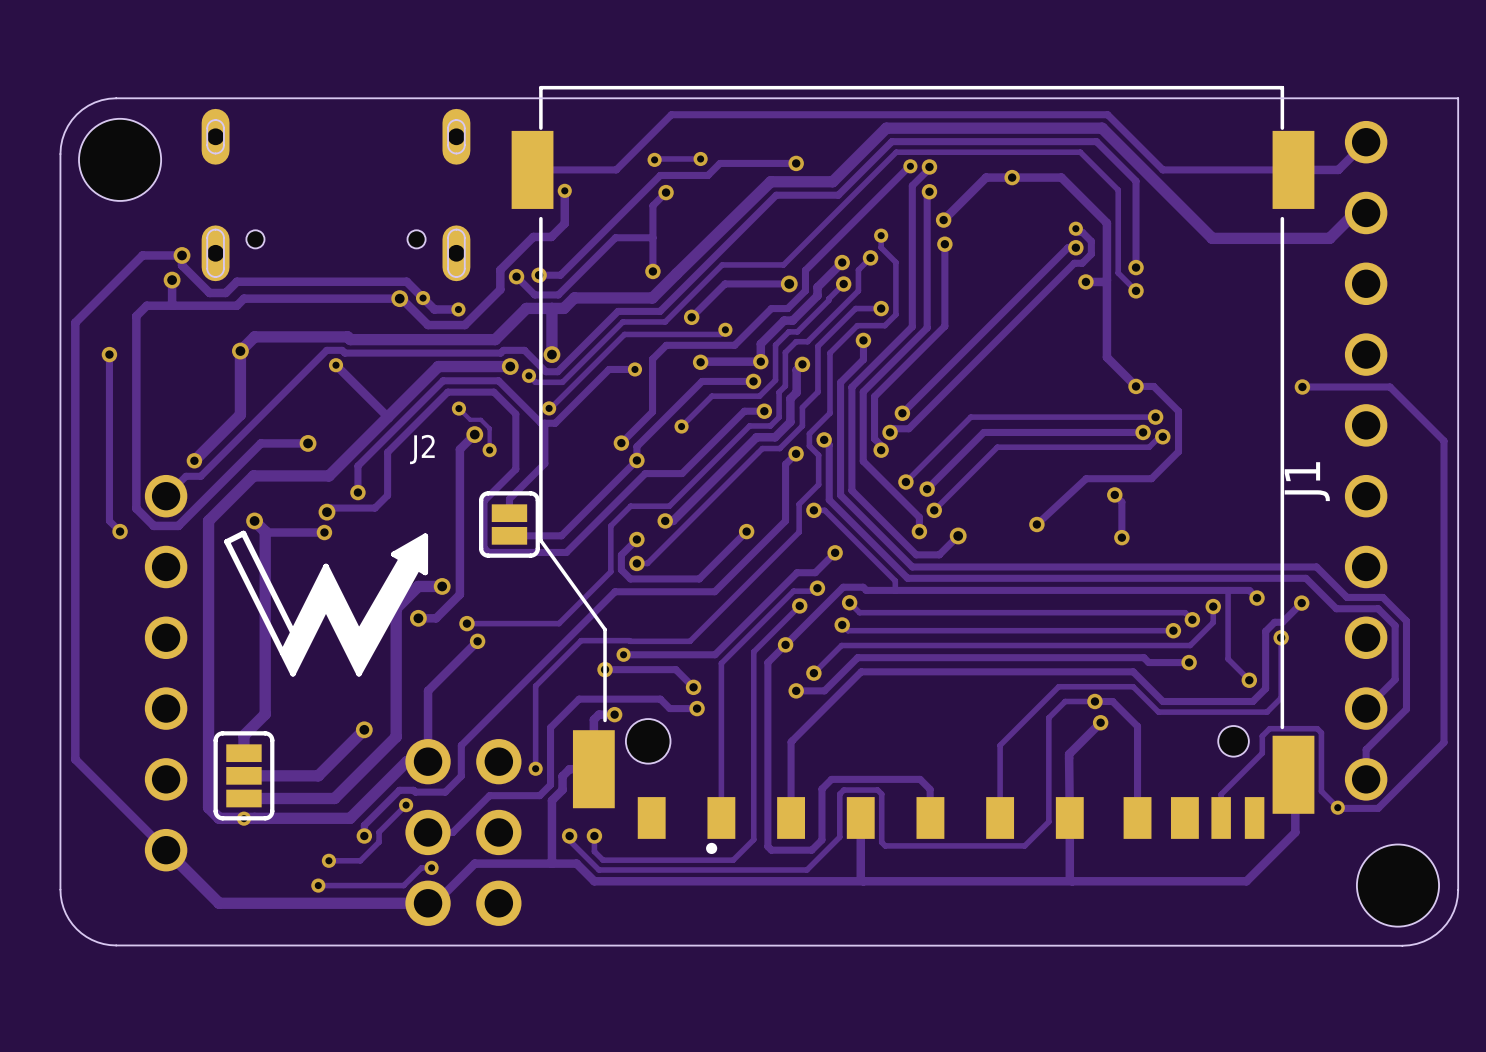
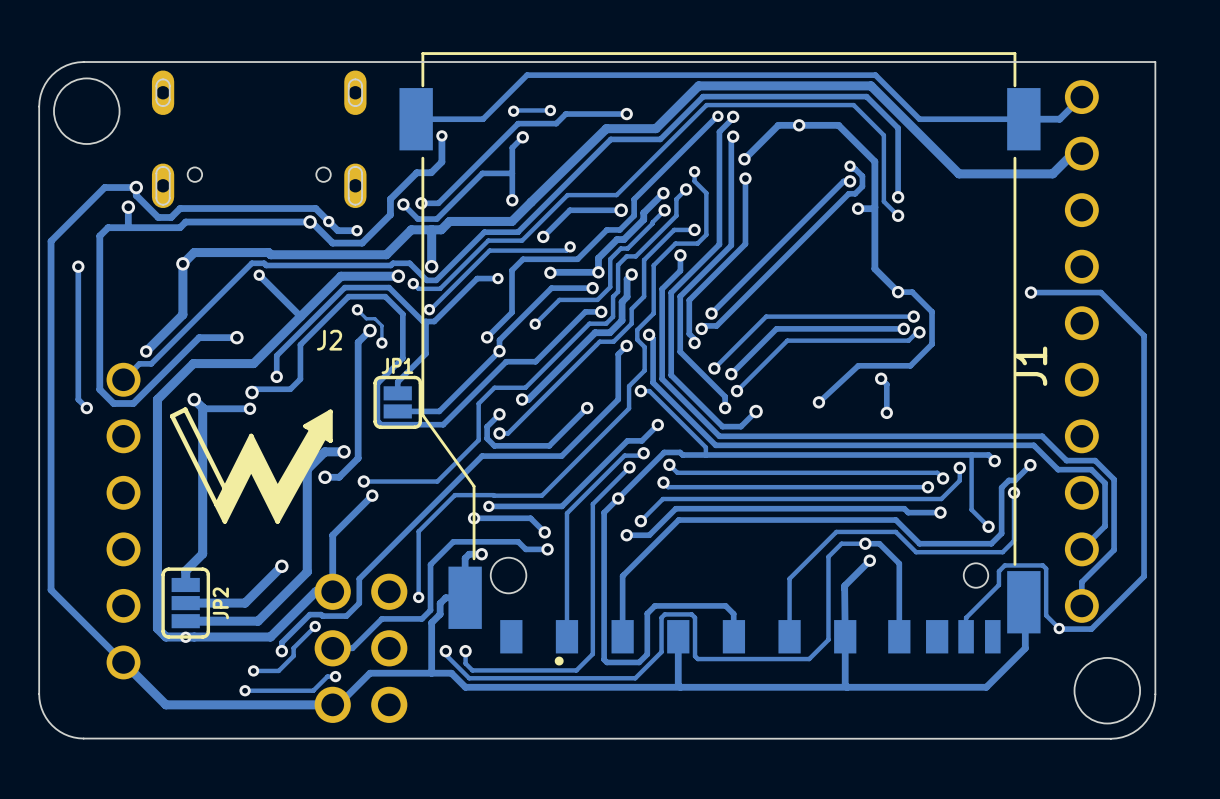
JP1 name: none -> JP1 (397, 365)
JP2 name: none -> JP2 (220, 603)

